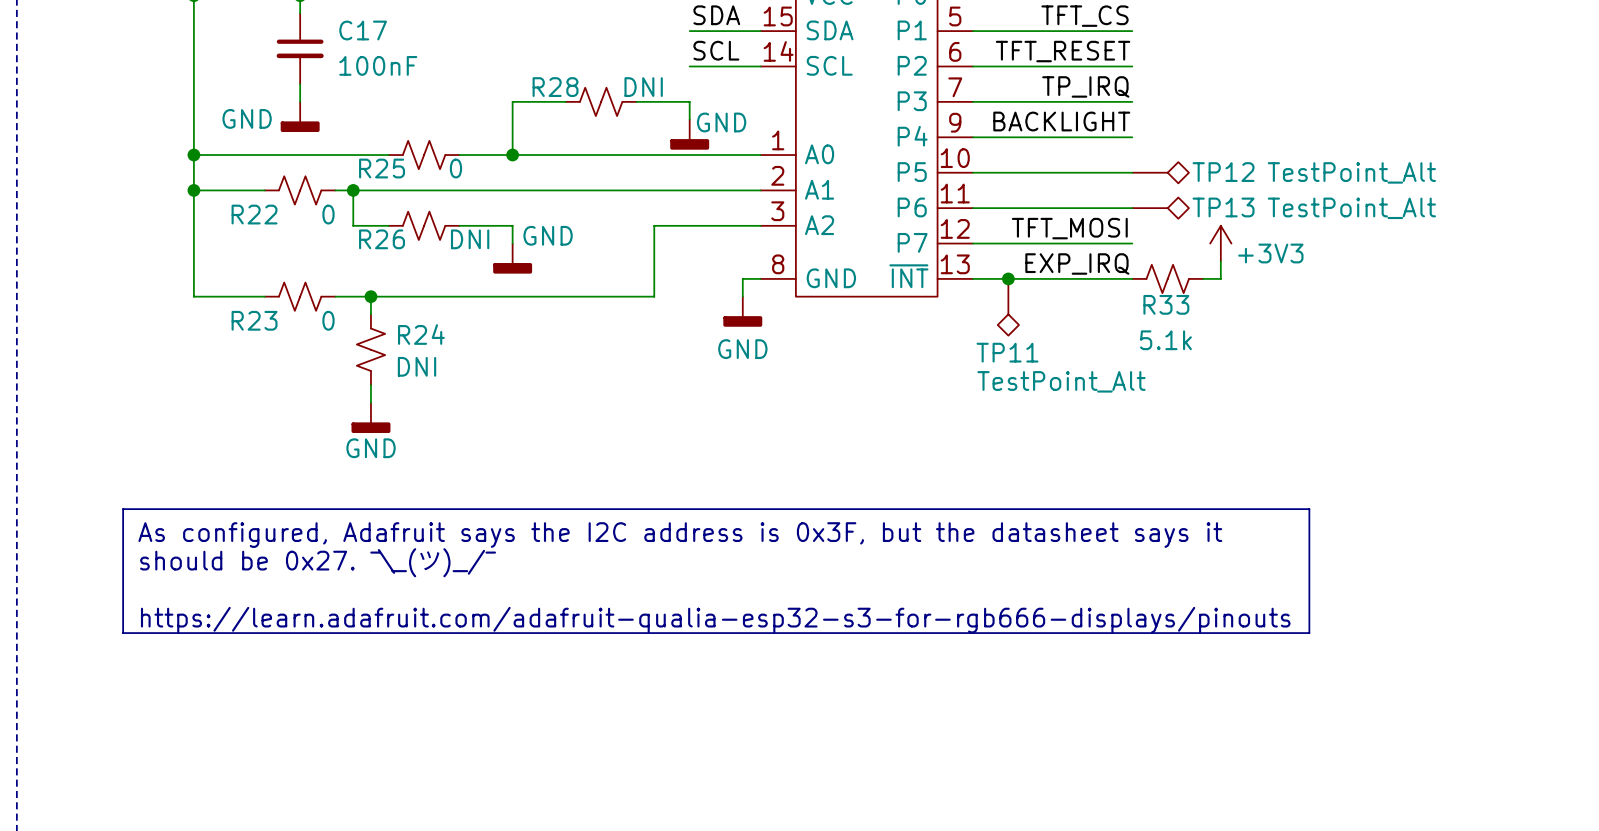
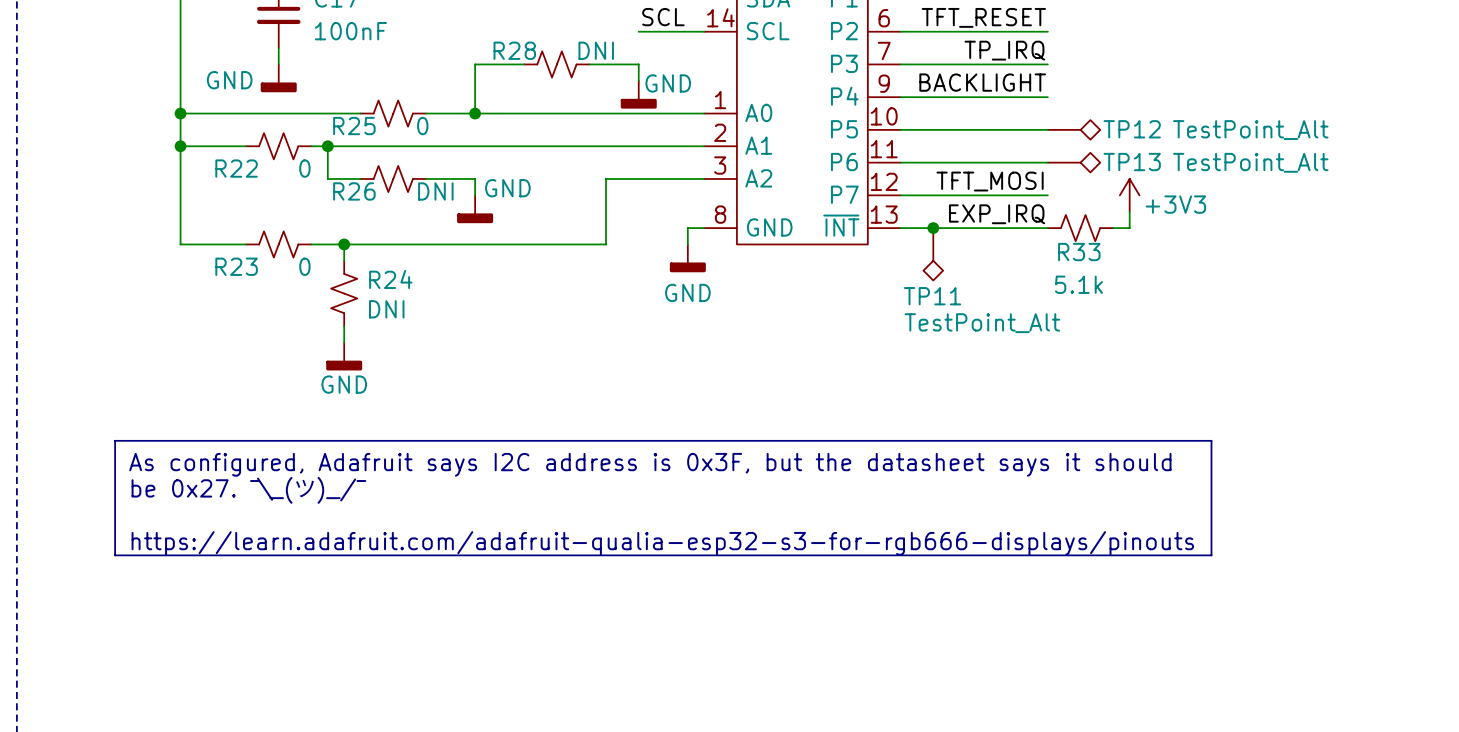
text: As configured, Adafruit says the I2C address is 0x3F, but the datasheet says it (680, 535) -> As configured, Adafruit says I2C address is 0x3F, but the datasheet says it should (650, 464)
text: should be 0x27. ¯\_(ツ)_/¯ (318, 562) -> be 0x27. ¯\_(ツ)_/¯ (248, 490)

